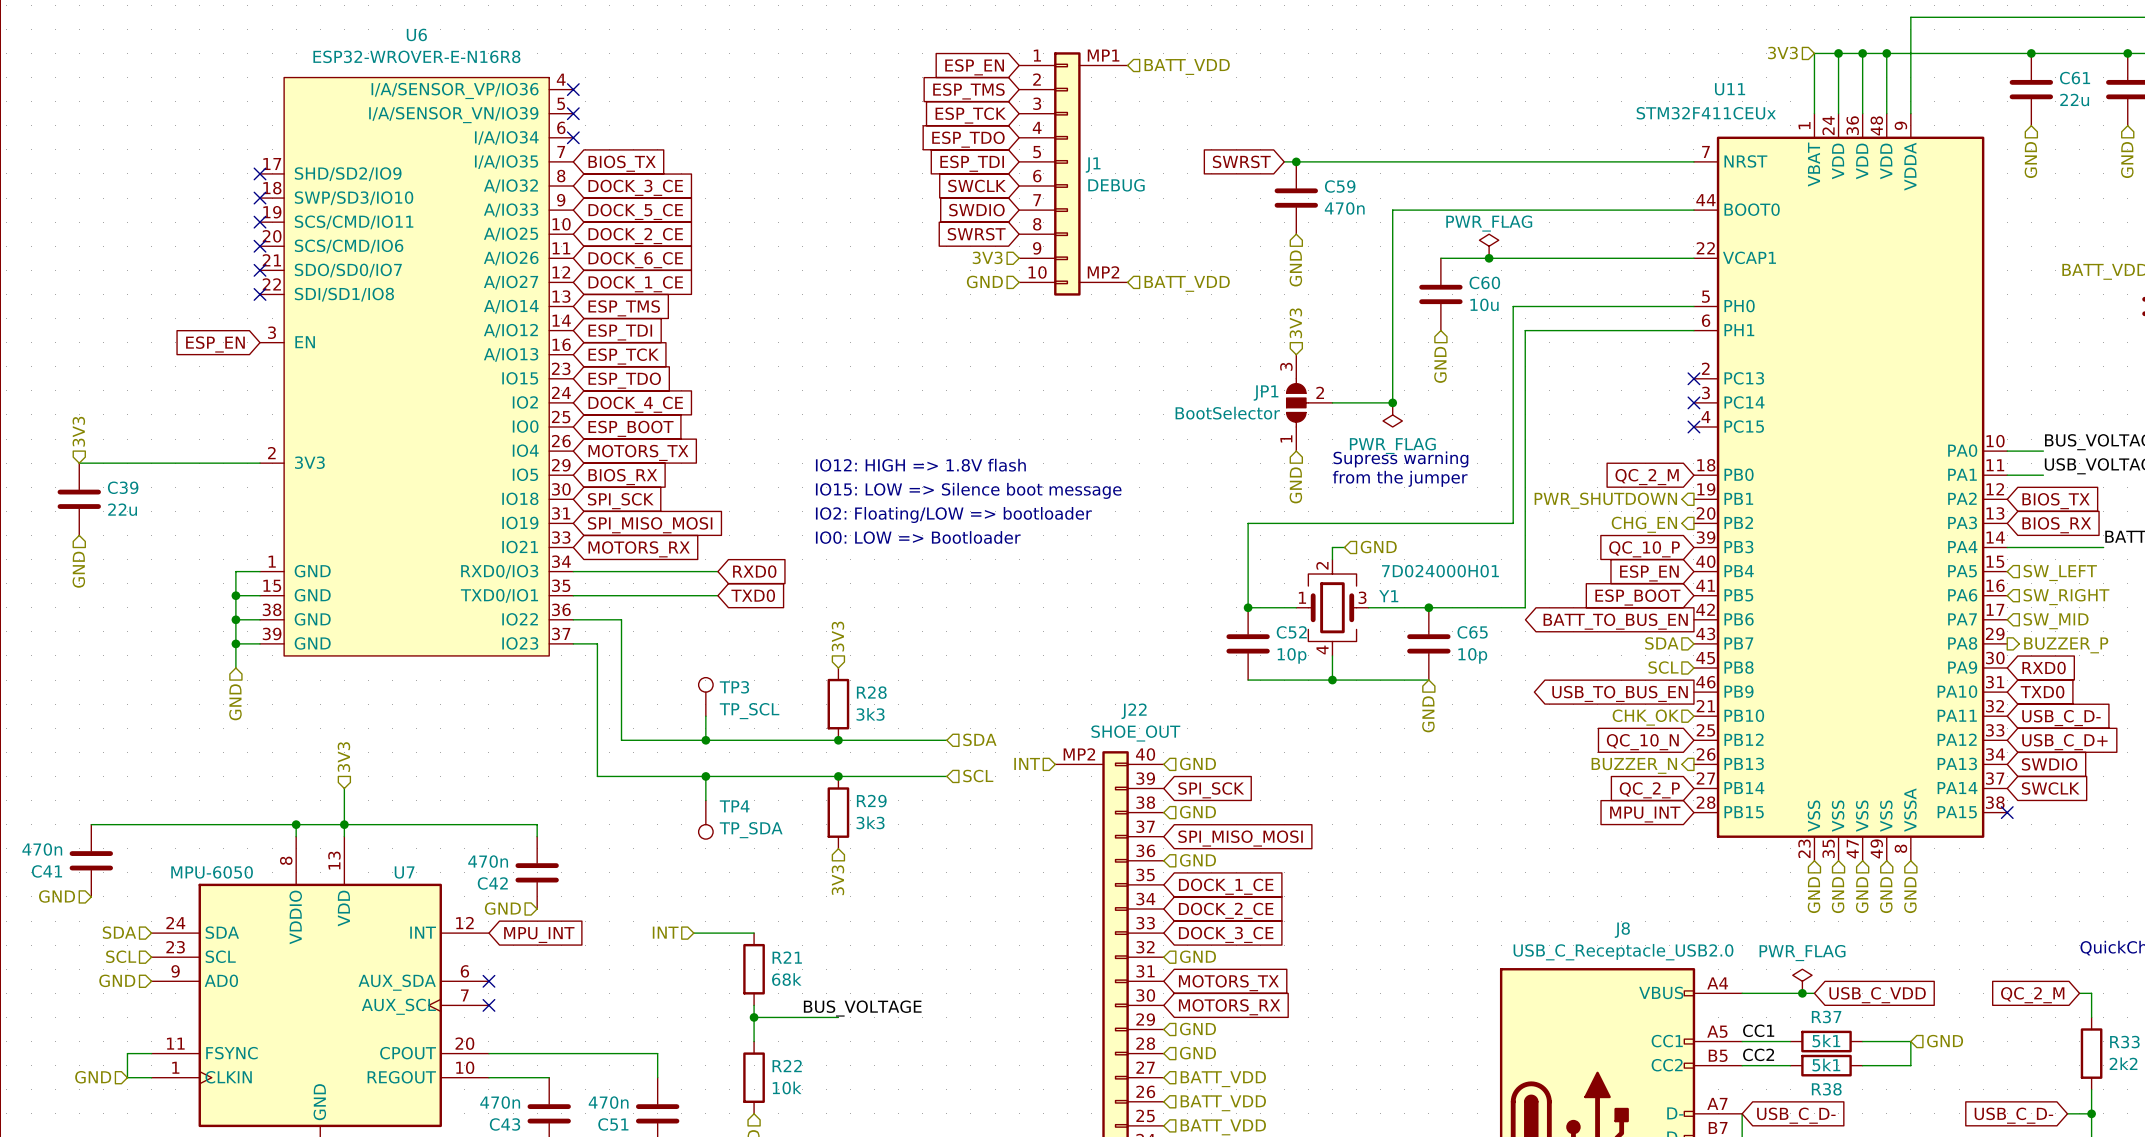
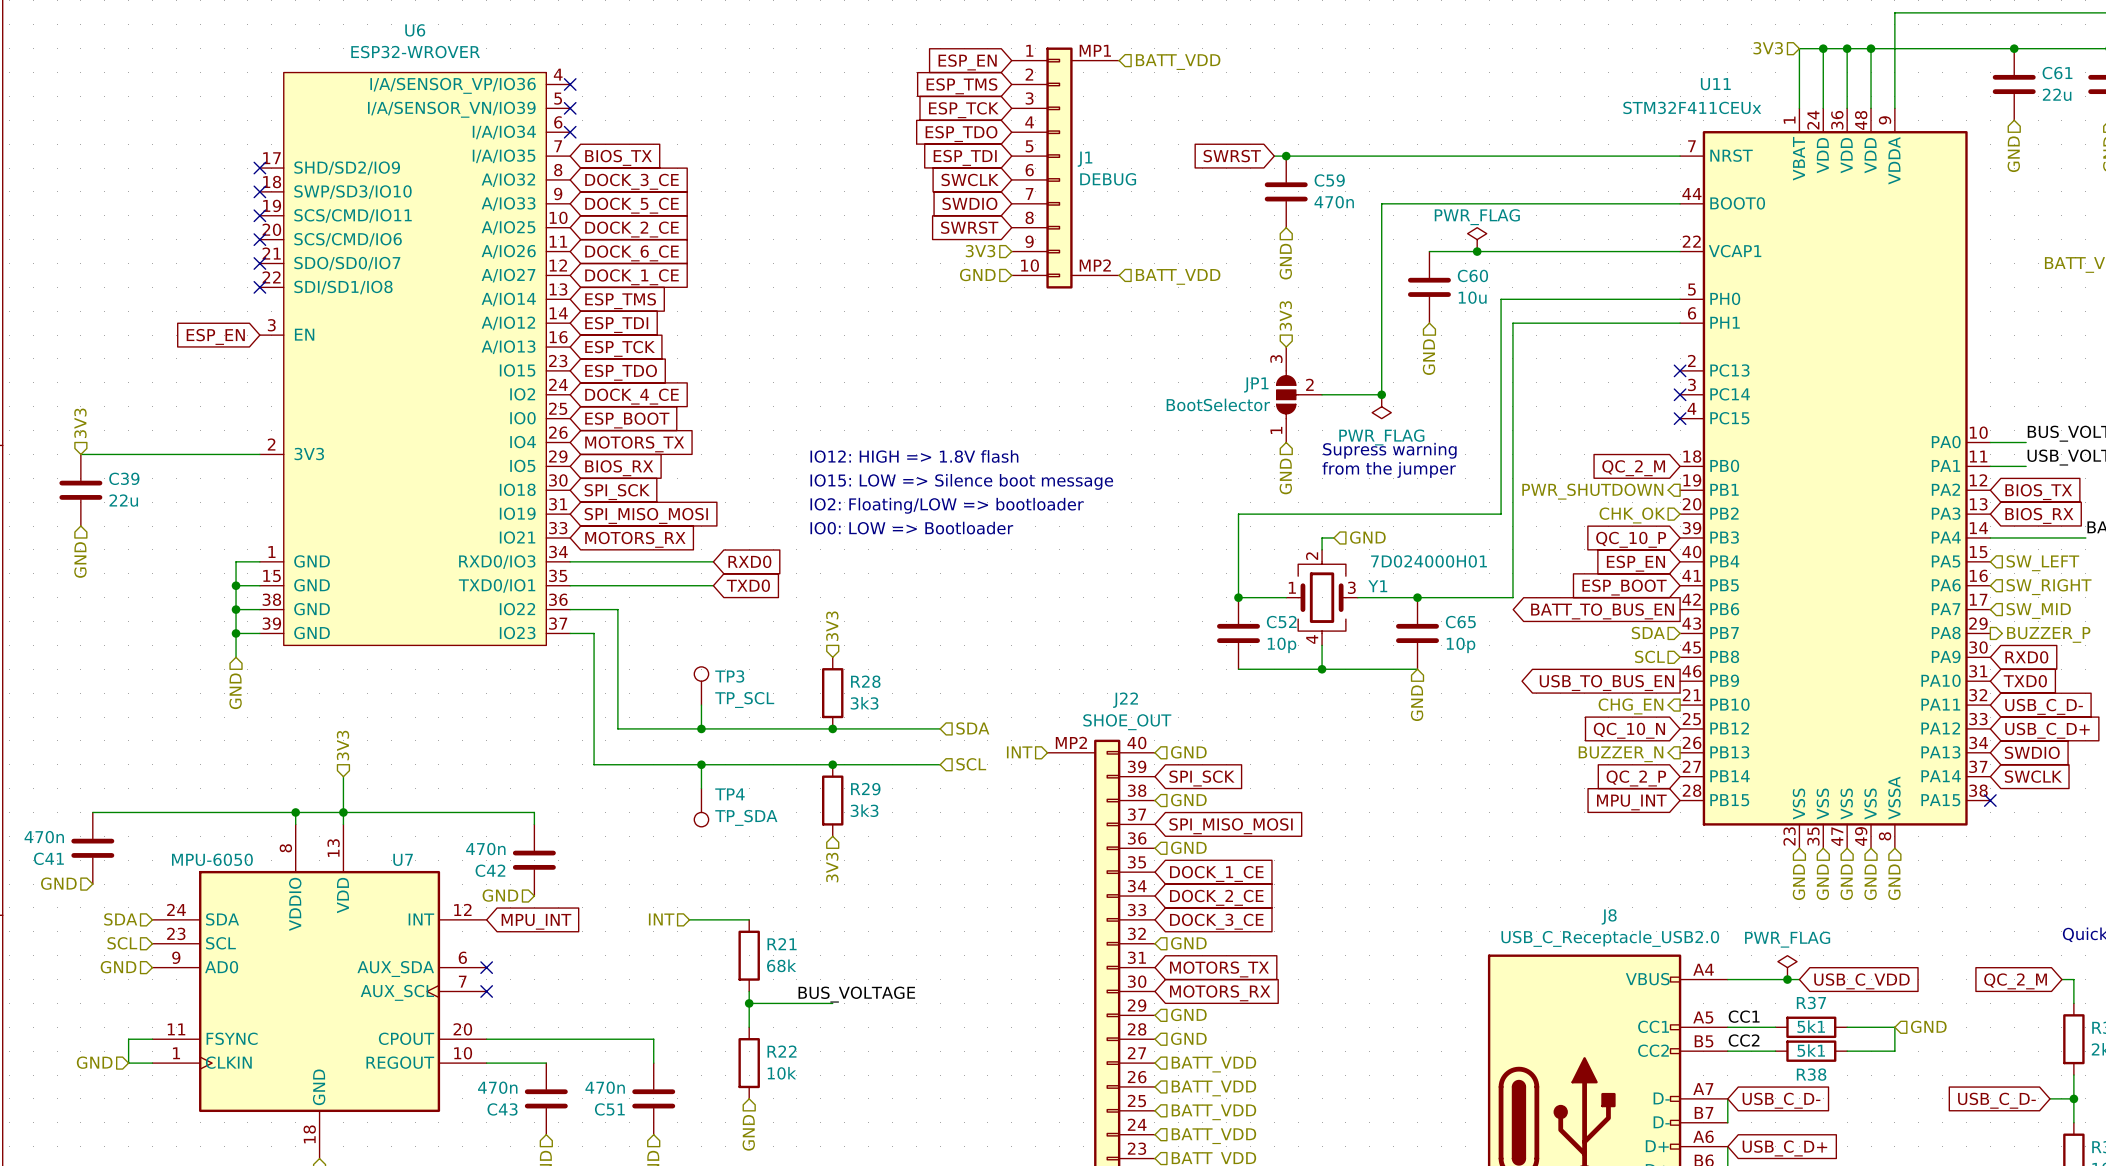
U6 value: ESP32-WROVER-E-N16R8 (416, 56) -> ESP32-WROVER (415, 52)
hierarchical label shape: output (1644, 524) -> input (1632, 515)
hierarchical label: CHG_EN (1644, 524) -> CHK_OK (1632, 515)
hierarchical label shape: input (1645, 717) -> output (1630, 706)
hierarchical label: CHK_OK (1645, 717) -> CHG_EN (1630, 706)

